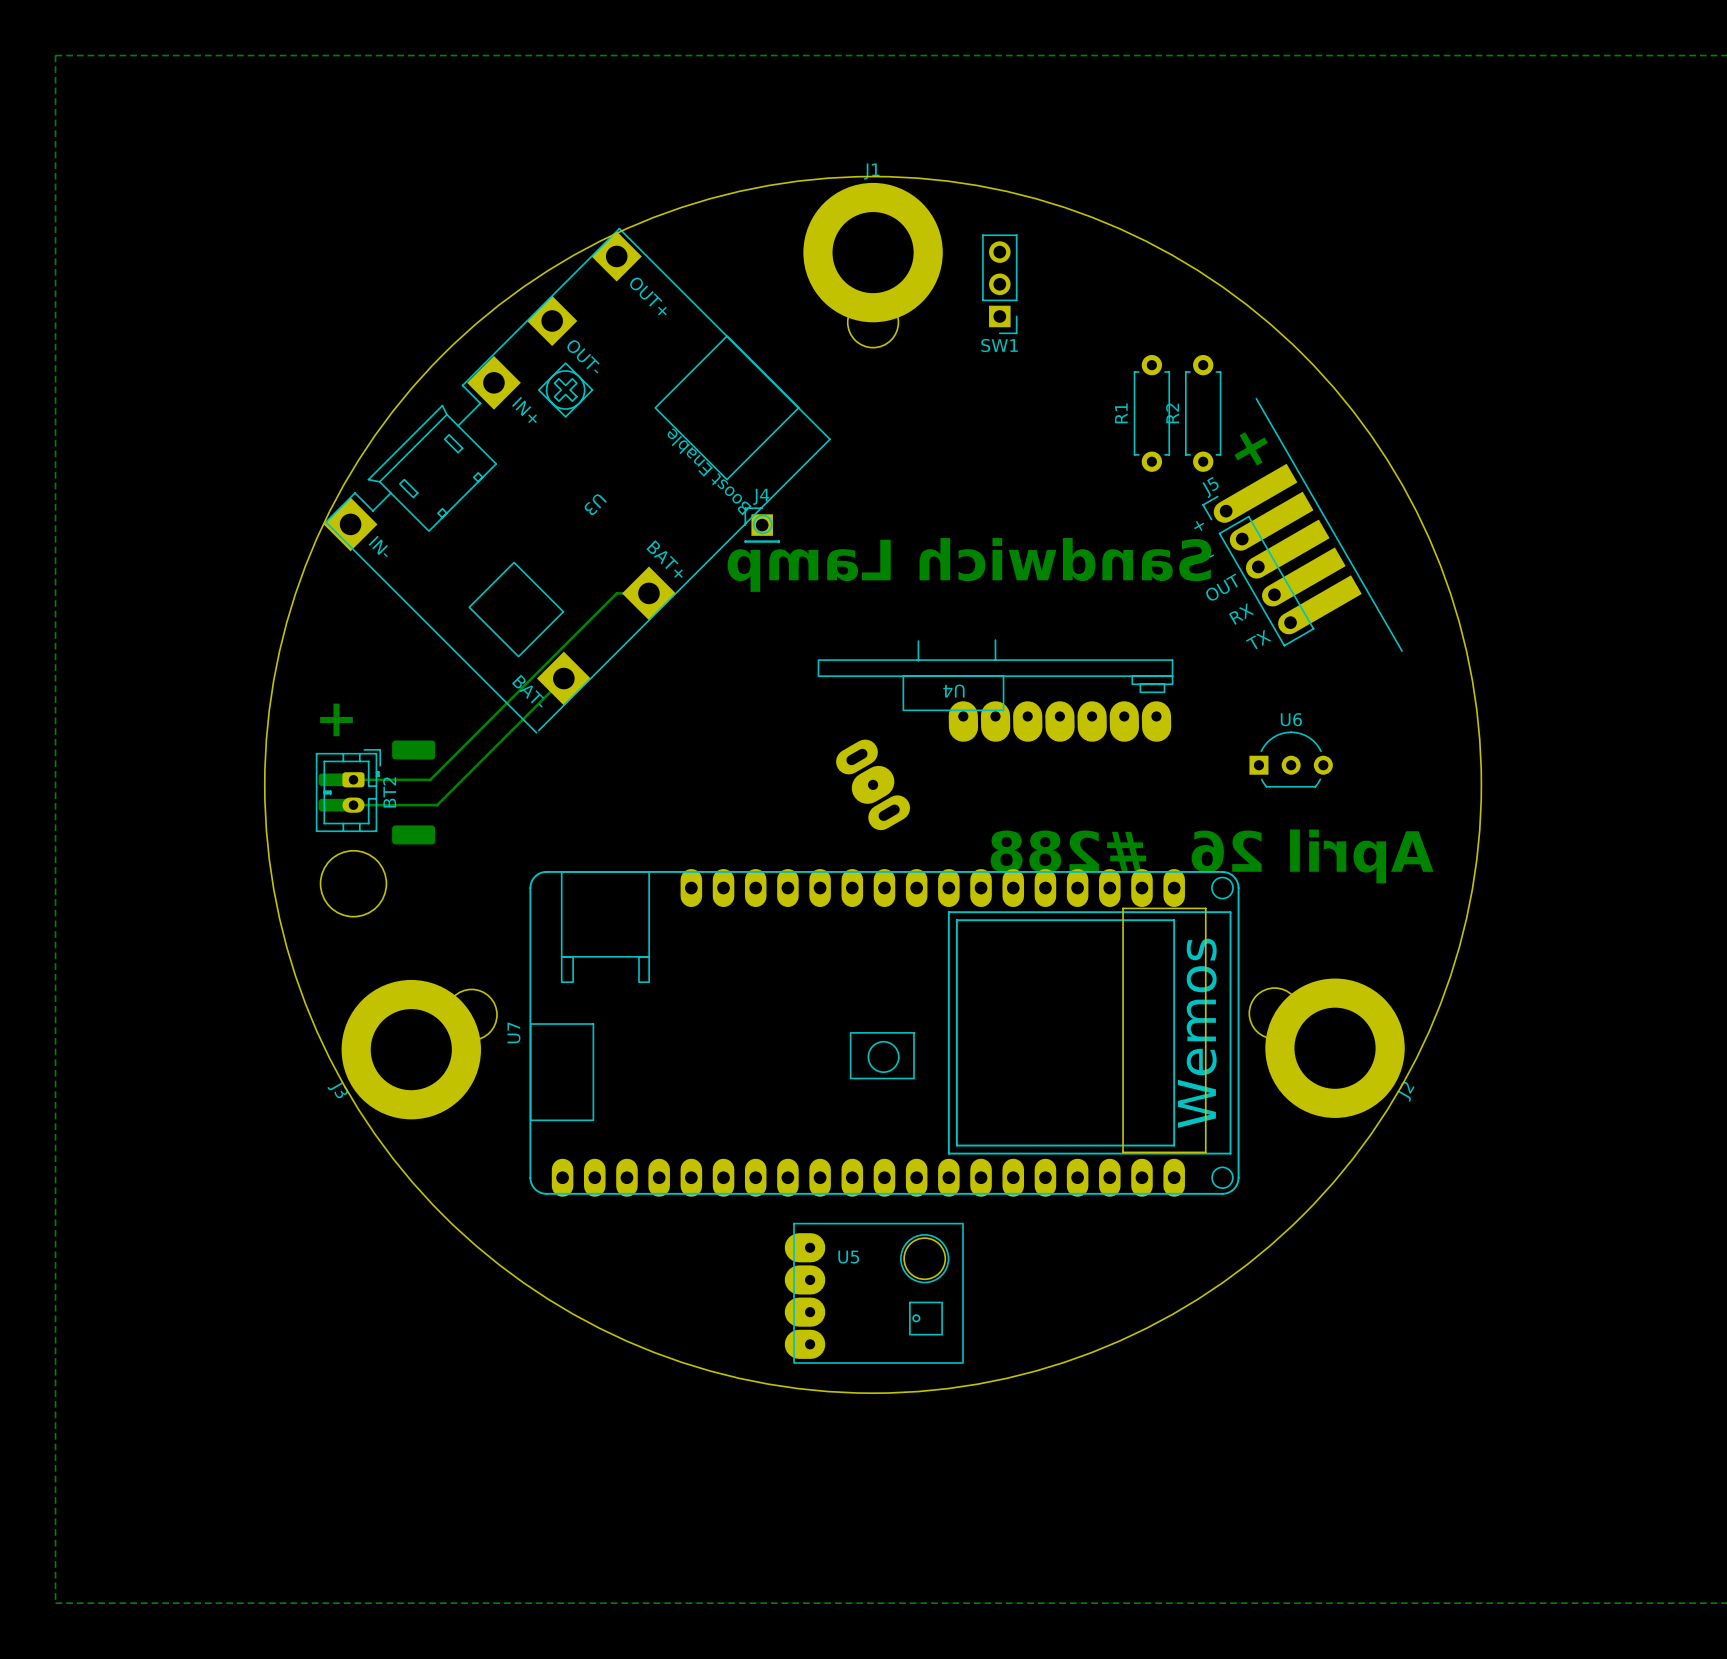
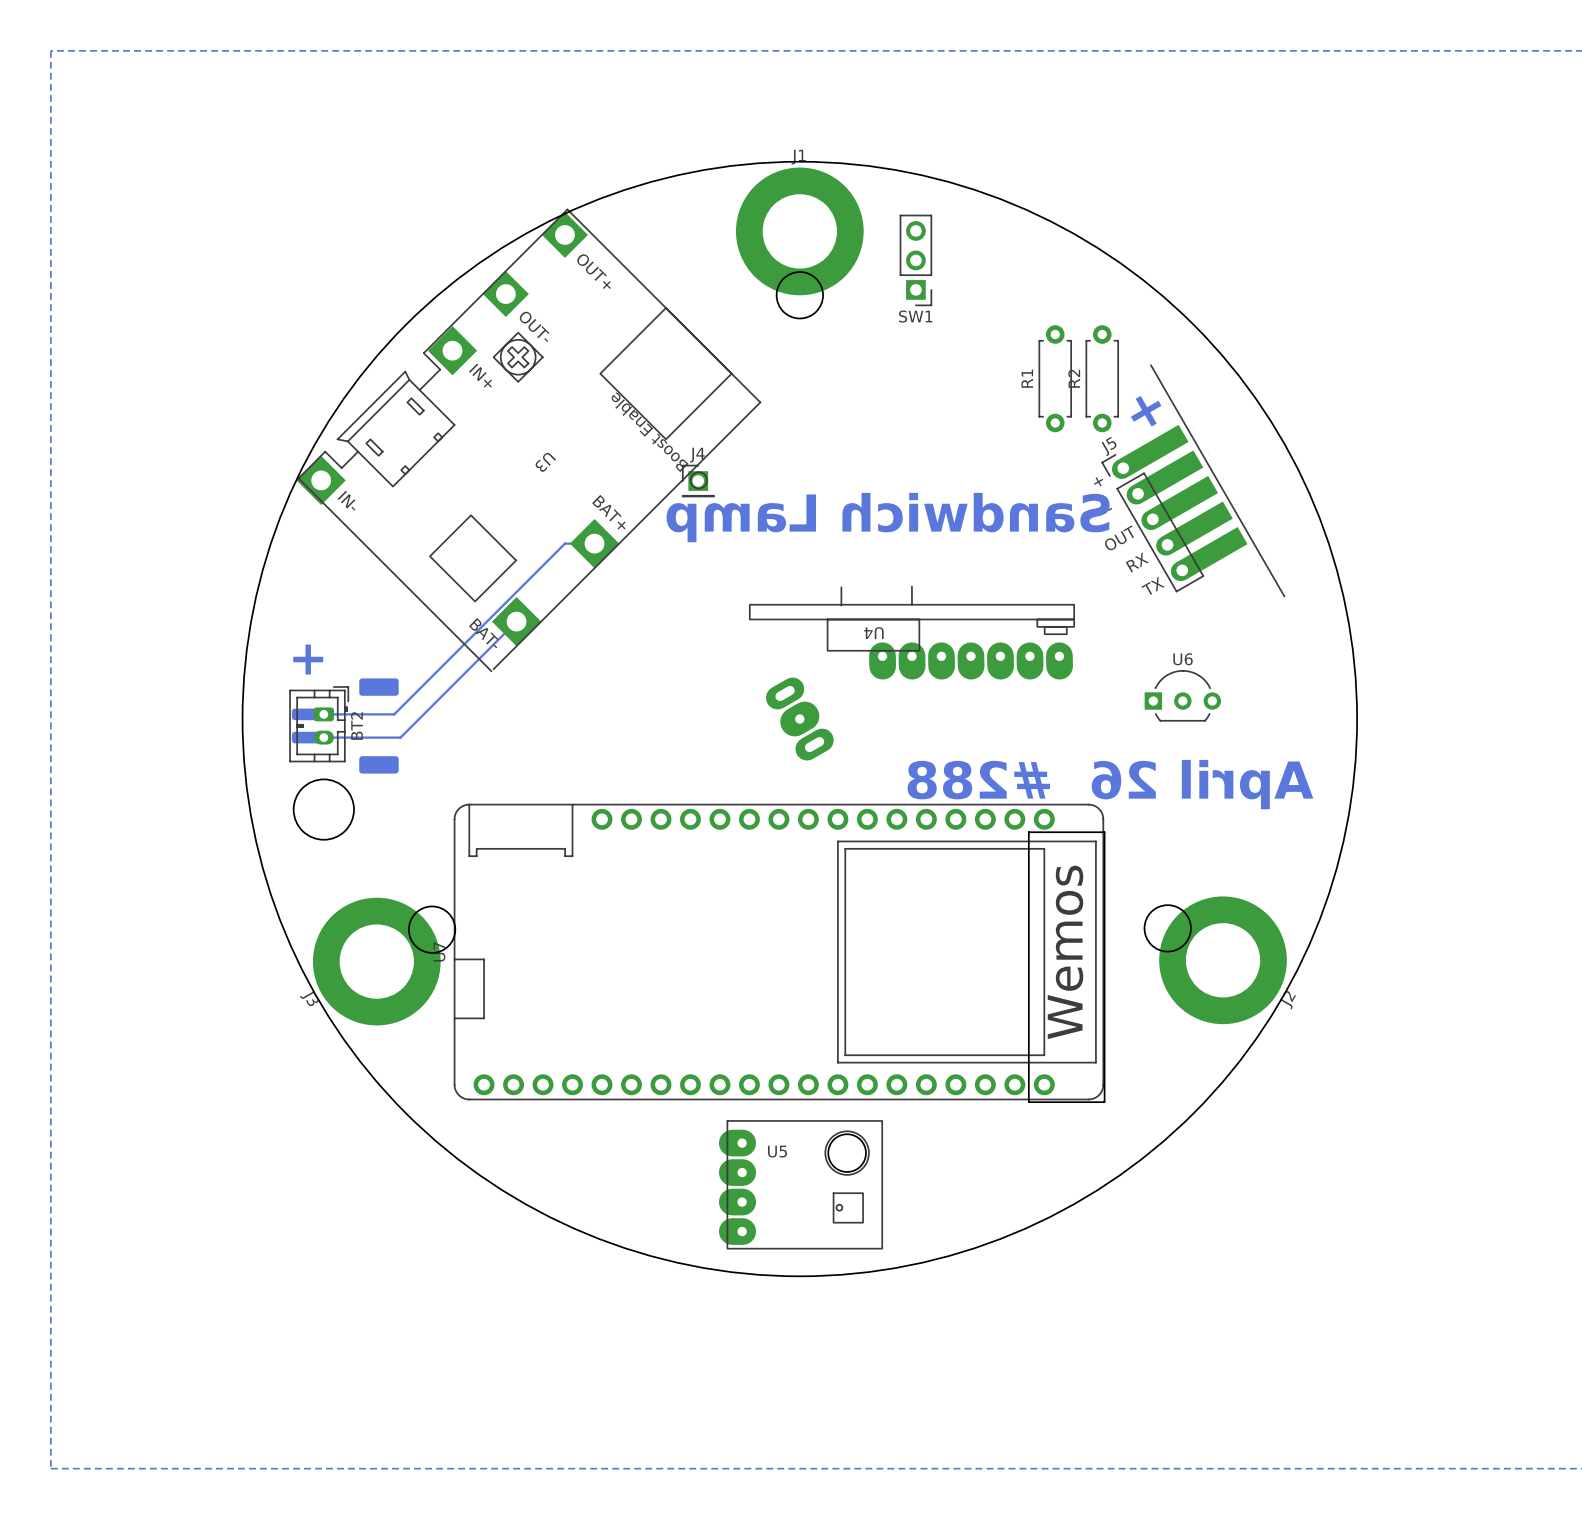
U7 footprint: [529, 869, 1240, 1197] -> [453, 803, 1105, 1101]
board edge: (1123, 1152) (1205, 1152) -> (1028, 1055) (1028, 1102) (1104, 1102) (1104, 1055)

